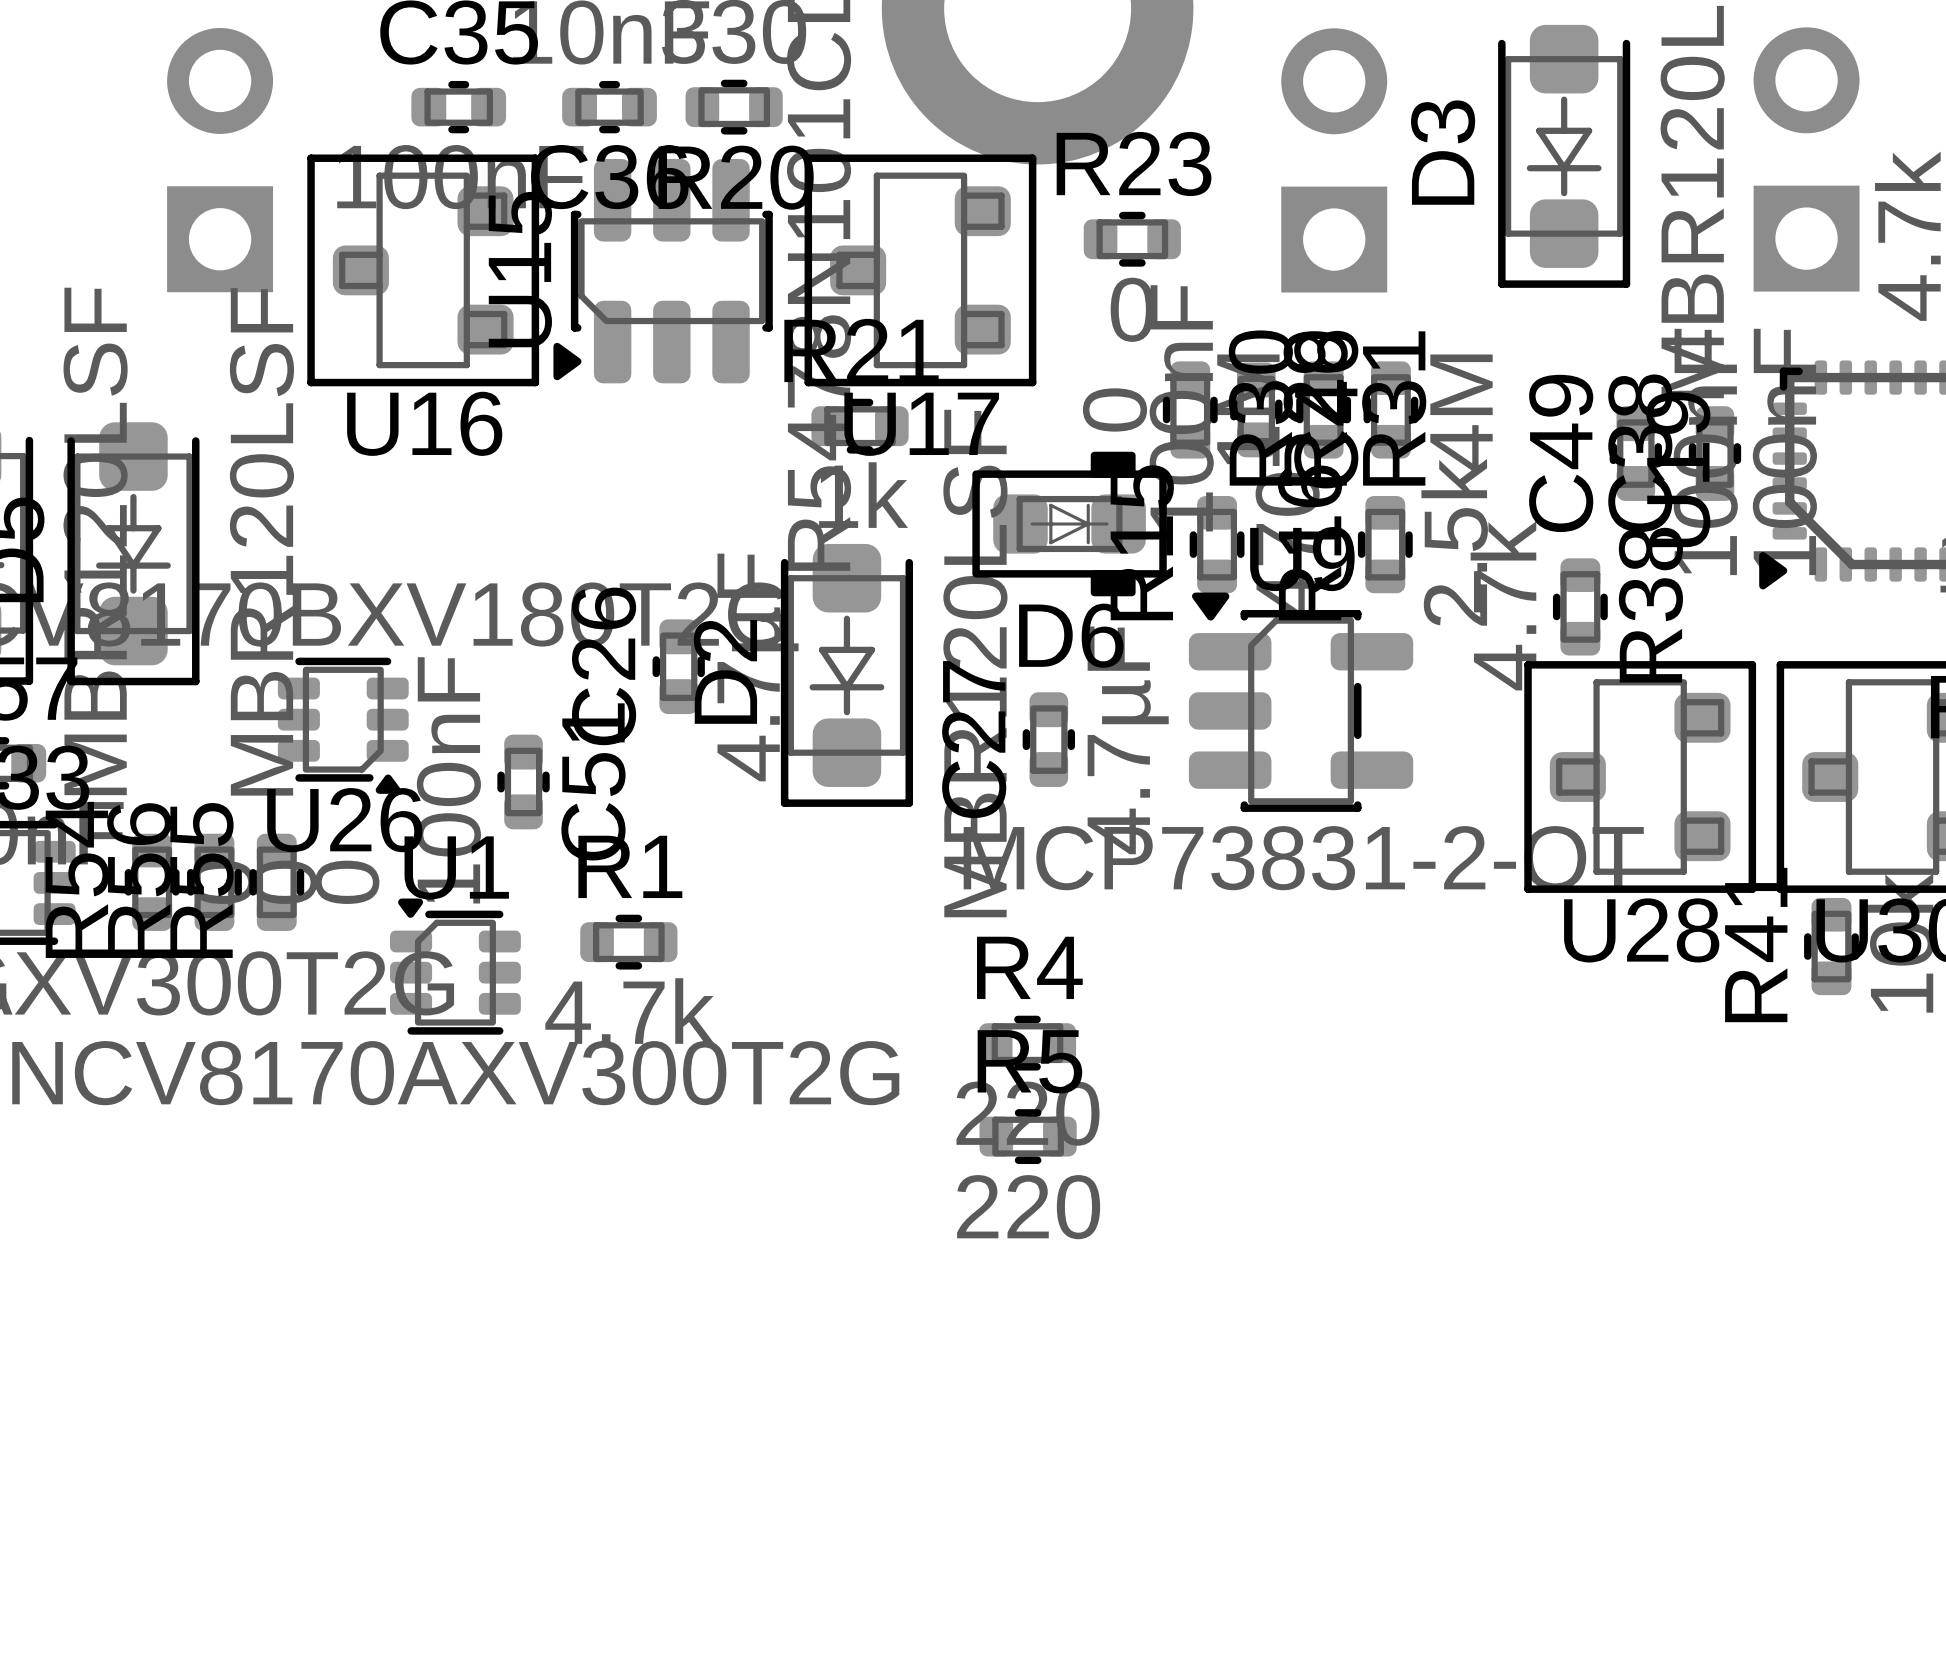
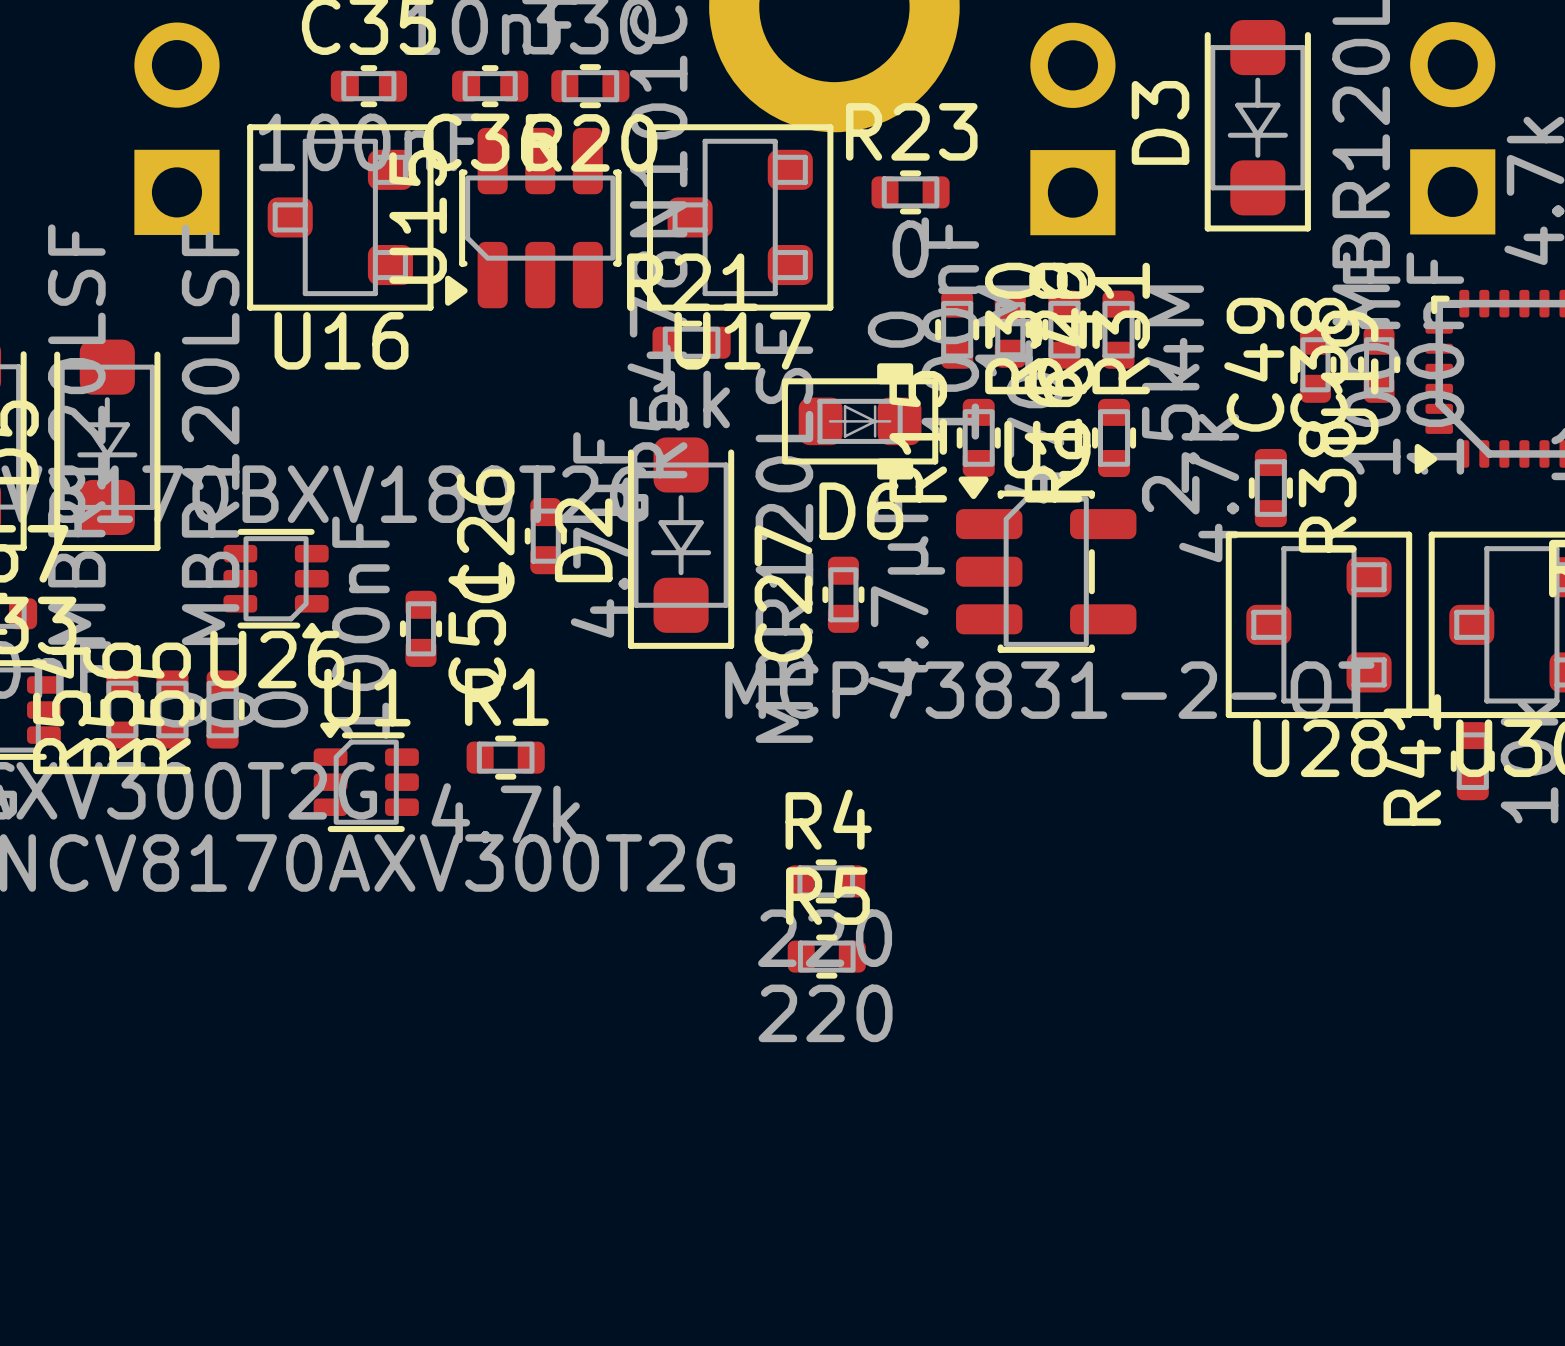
R4 position: (1027, 1043) -> (826, 881)
R5 position: (1028, 1136) -> (826, 956)

